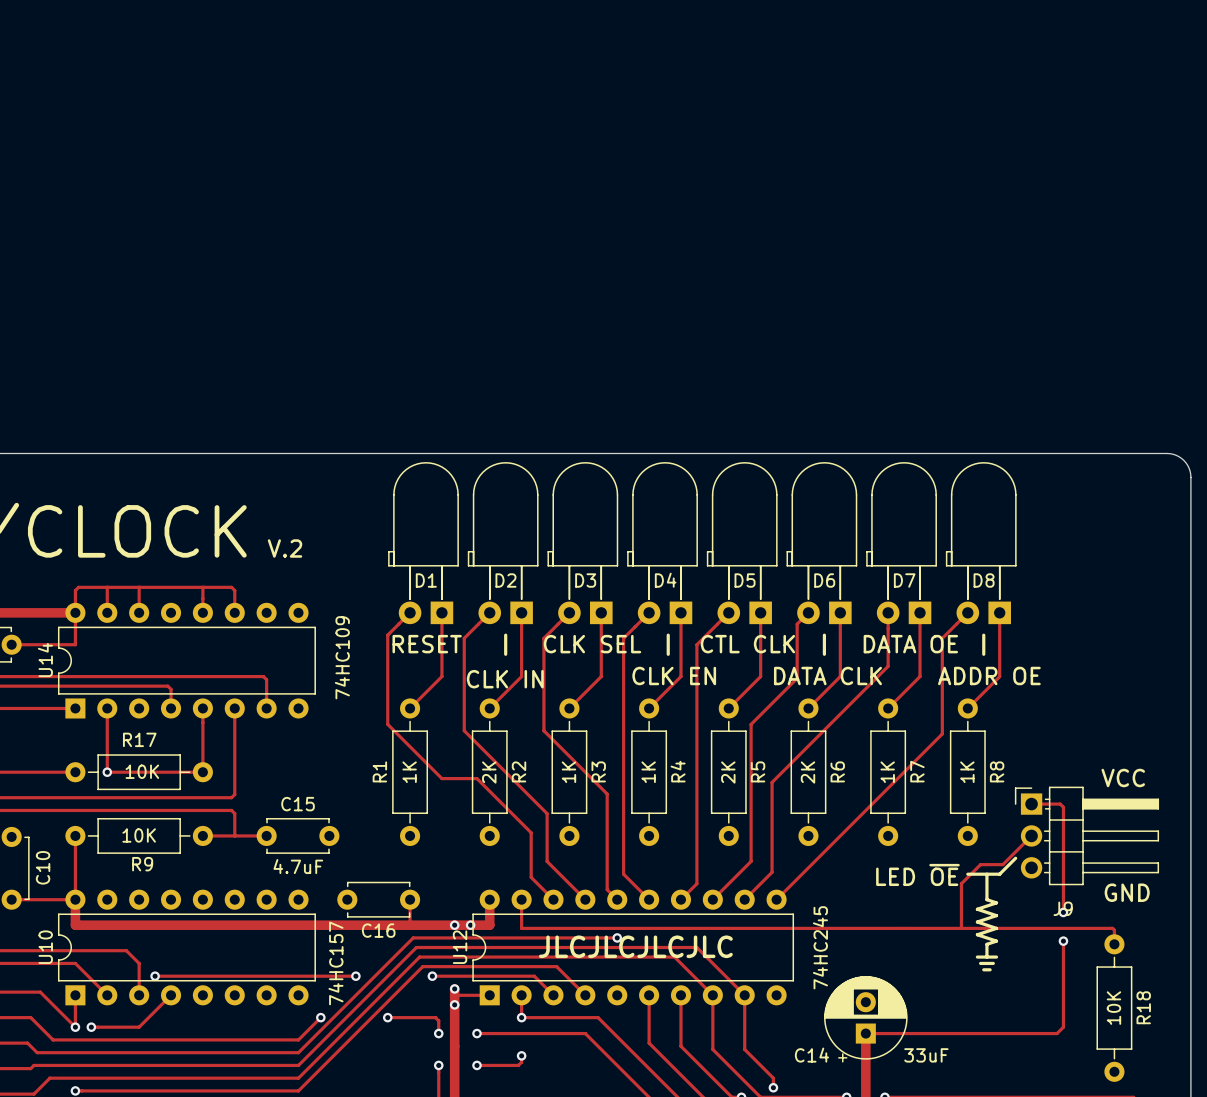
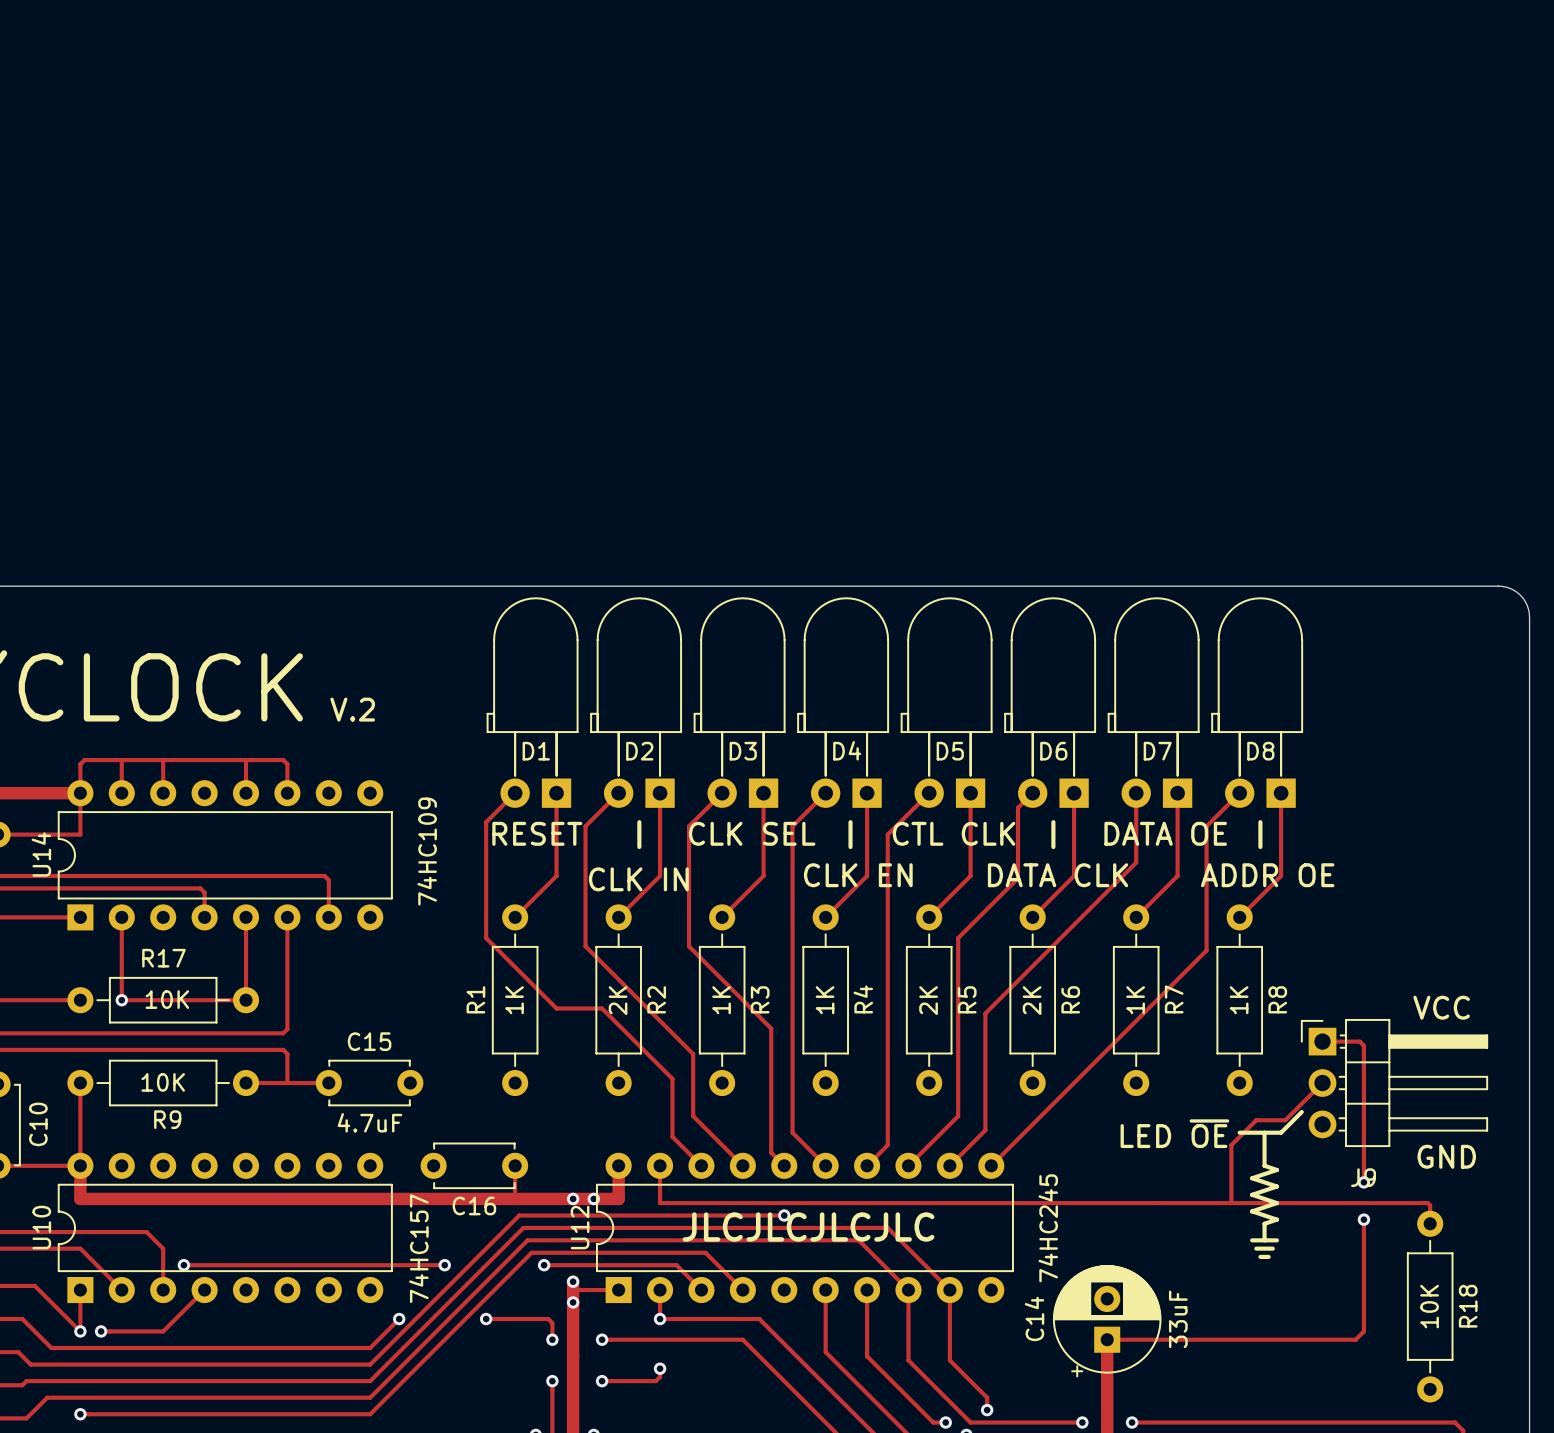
C14 name rotation: 0° (811, 1055) -> 90° counterclockwise (1034, 1318)
C14 value rotation: 0° (926, 1055) -> 90° counterclockwise (1178, 1319)

